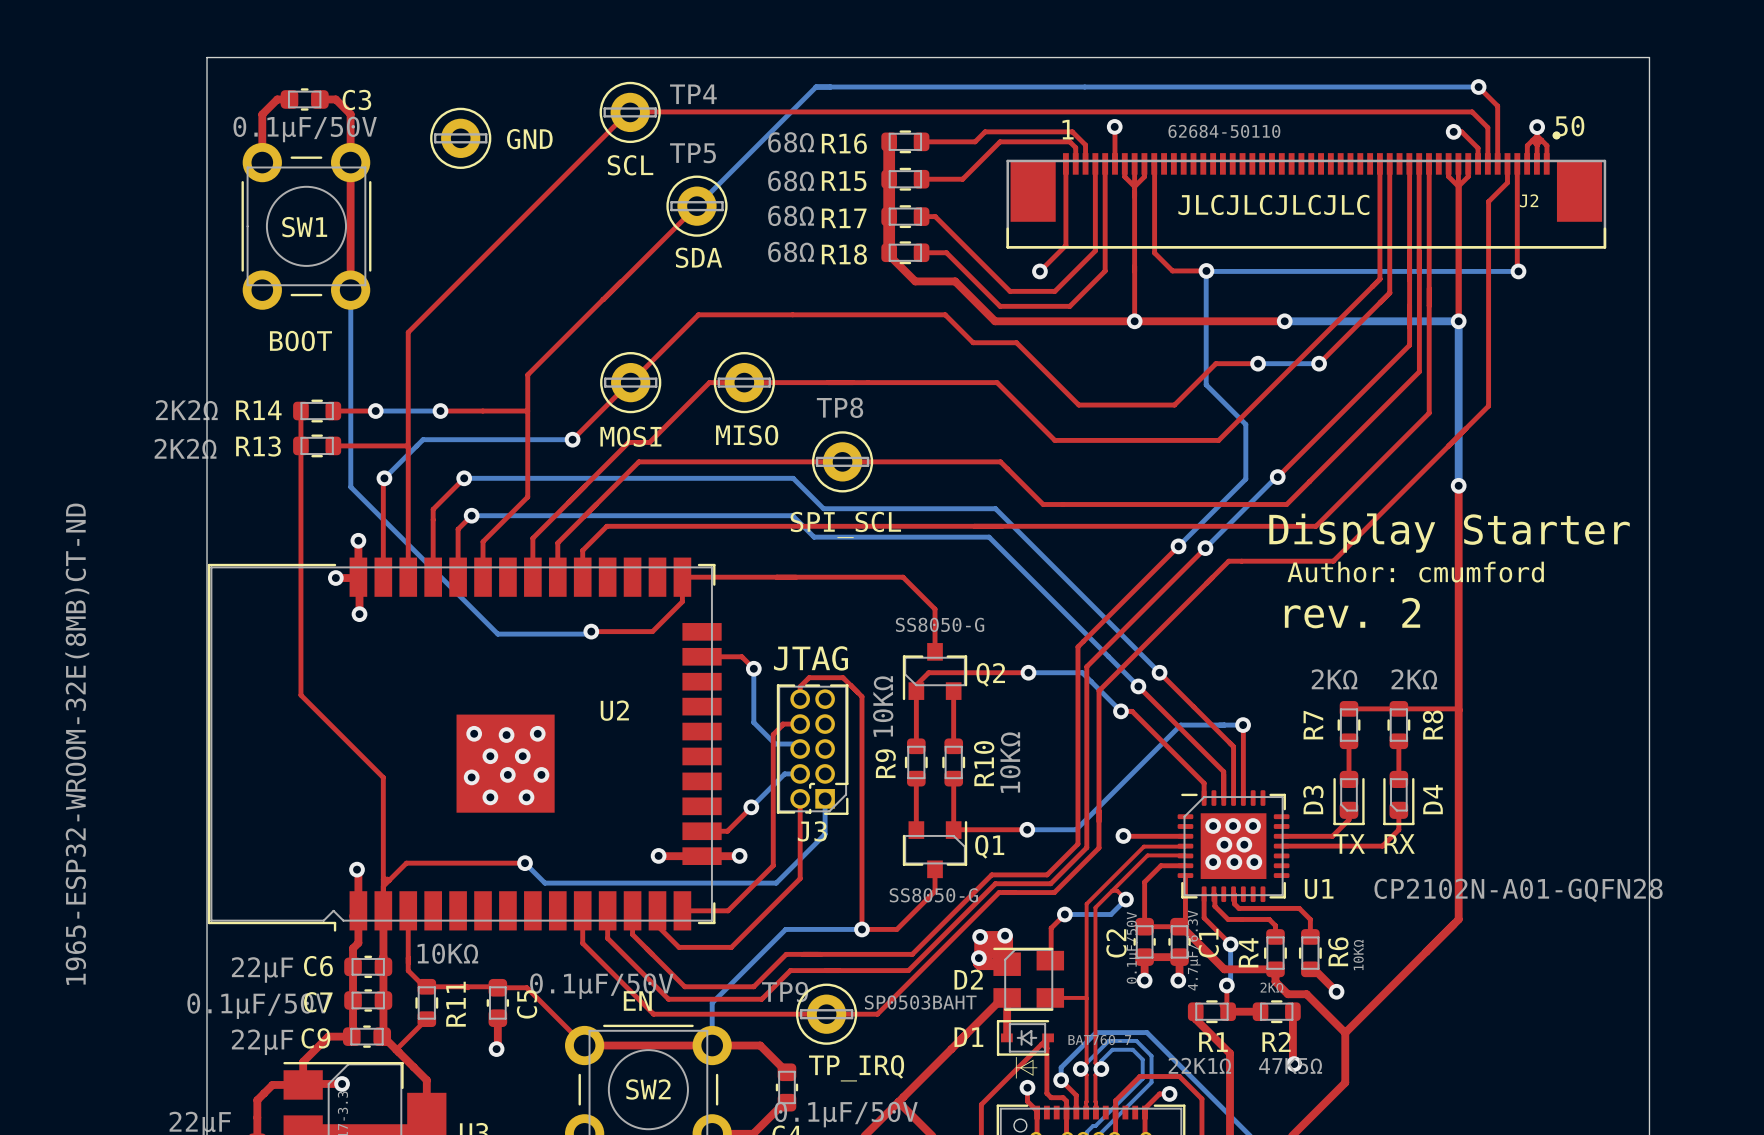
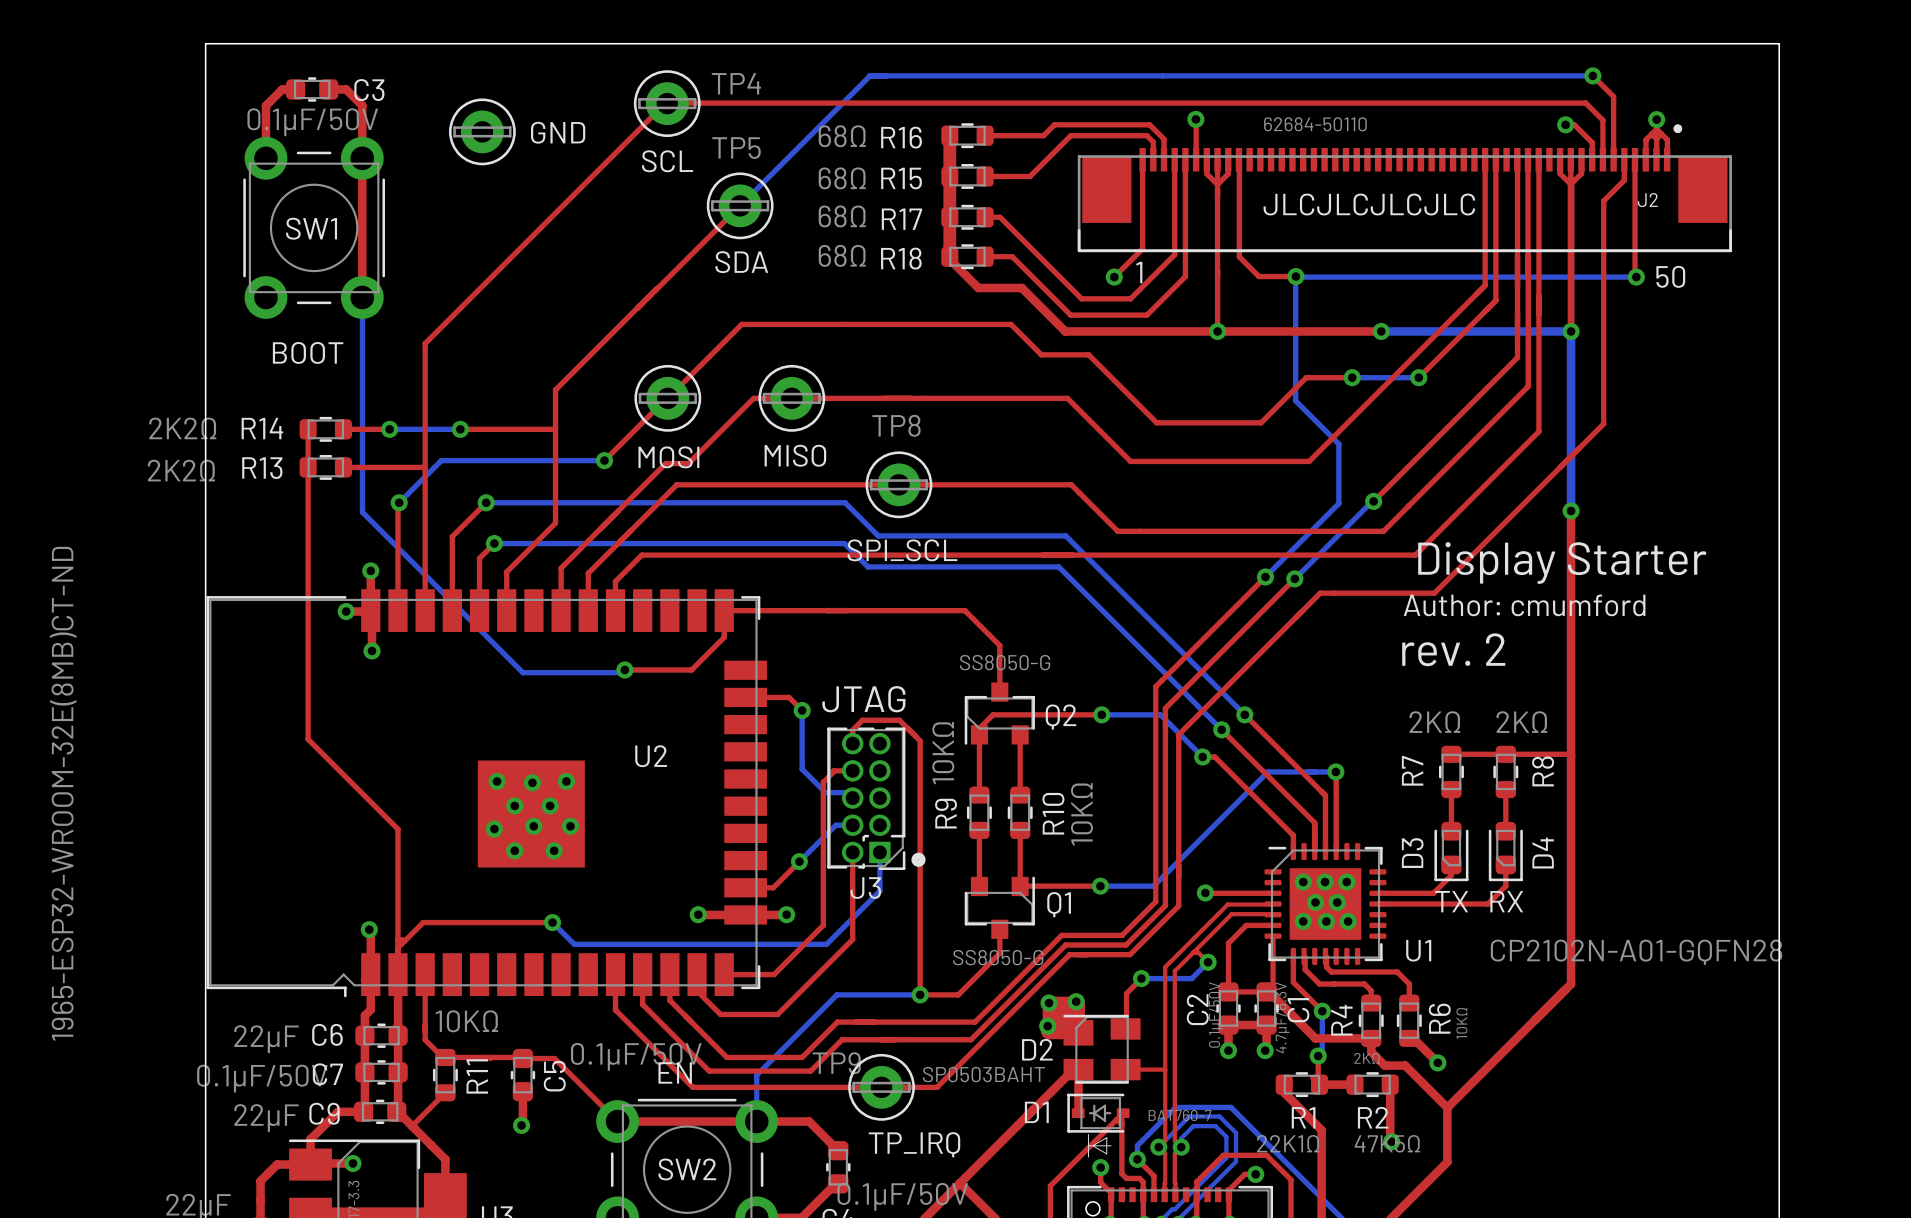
text position: 50 (1569, 126) -> 50 (1670, 276)
text position: 1 (1068, 129) -> 1 (1139, 272)
drawing: none -> [911, 852, 926, 867]

